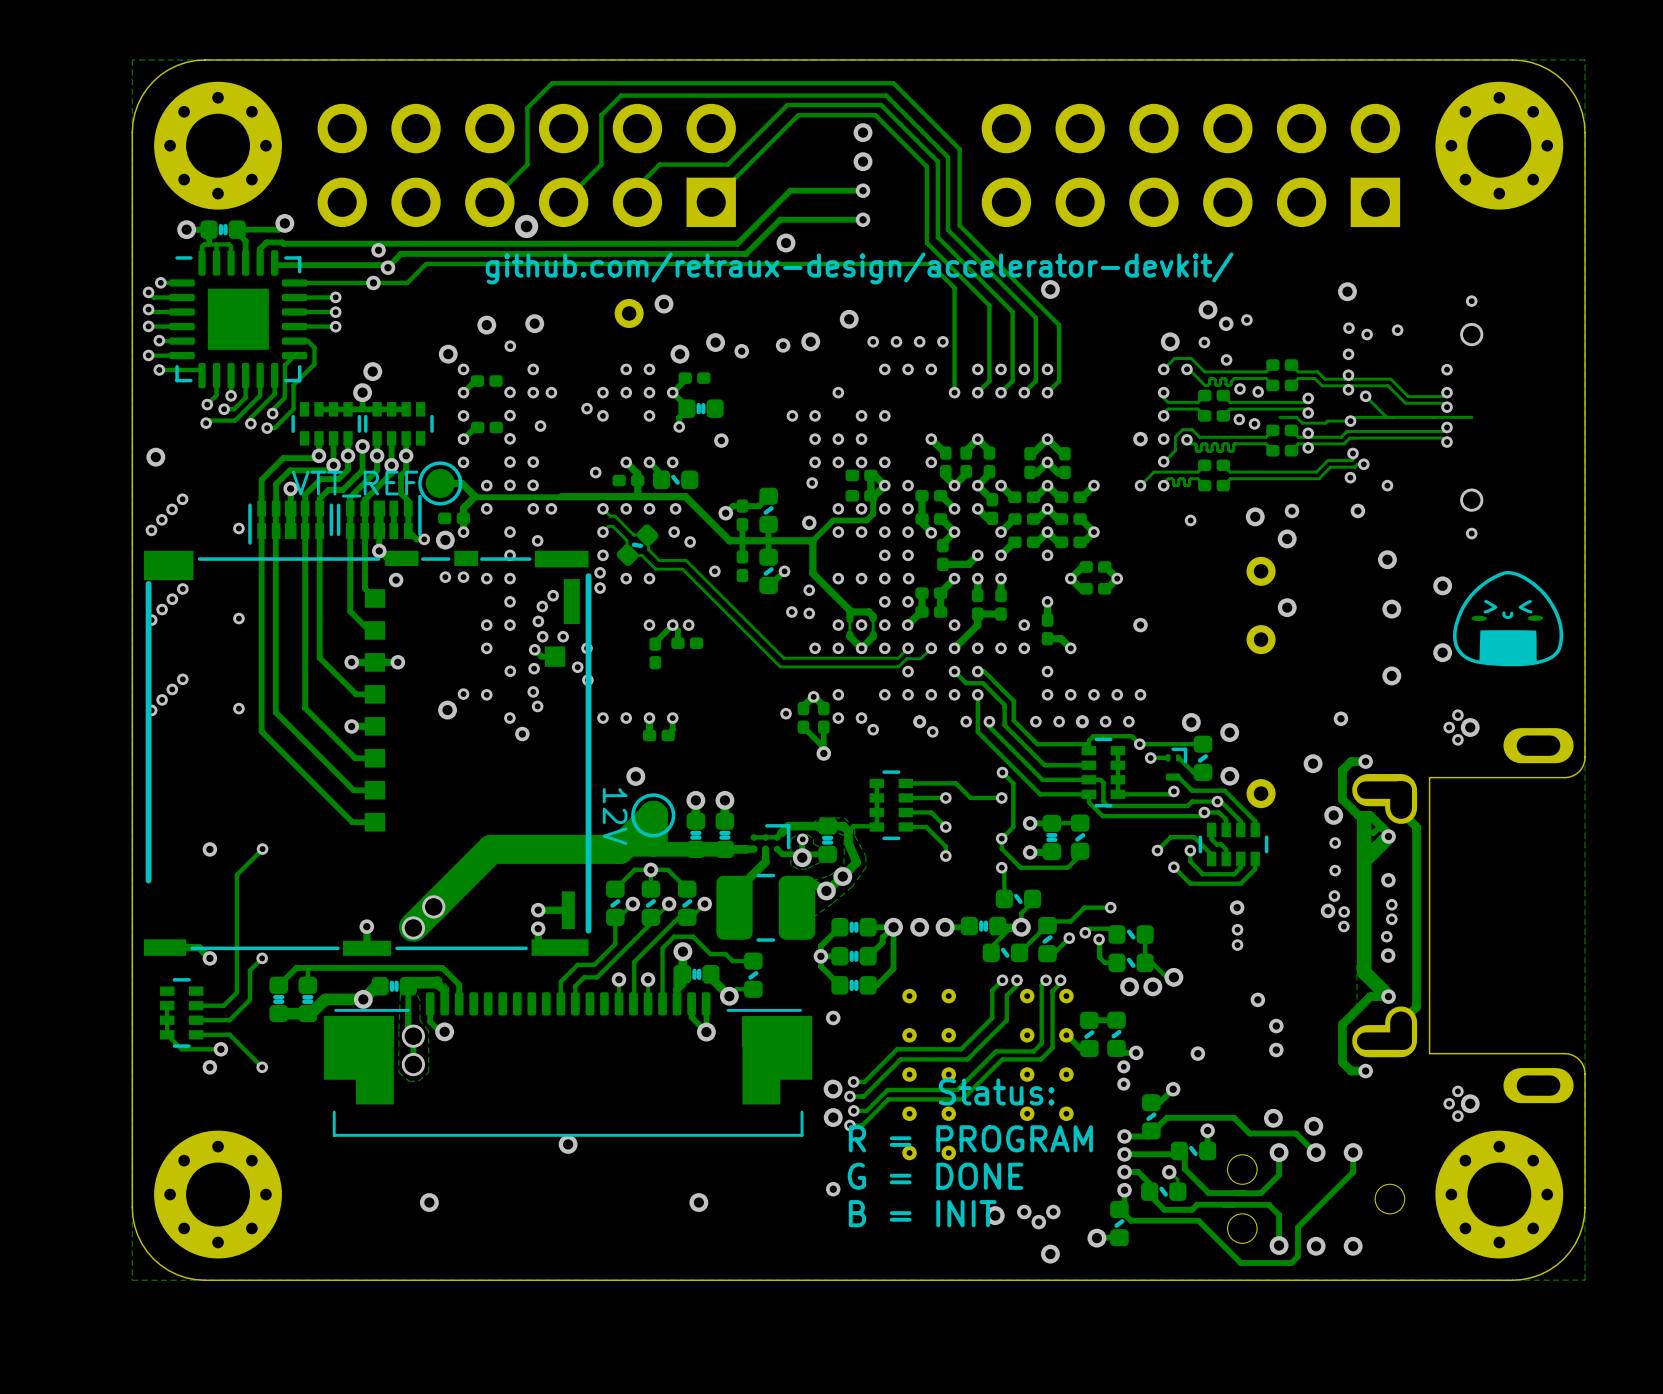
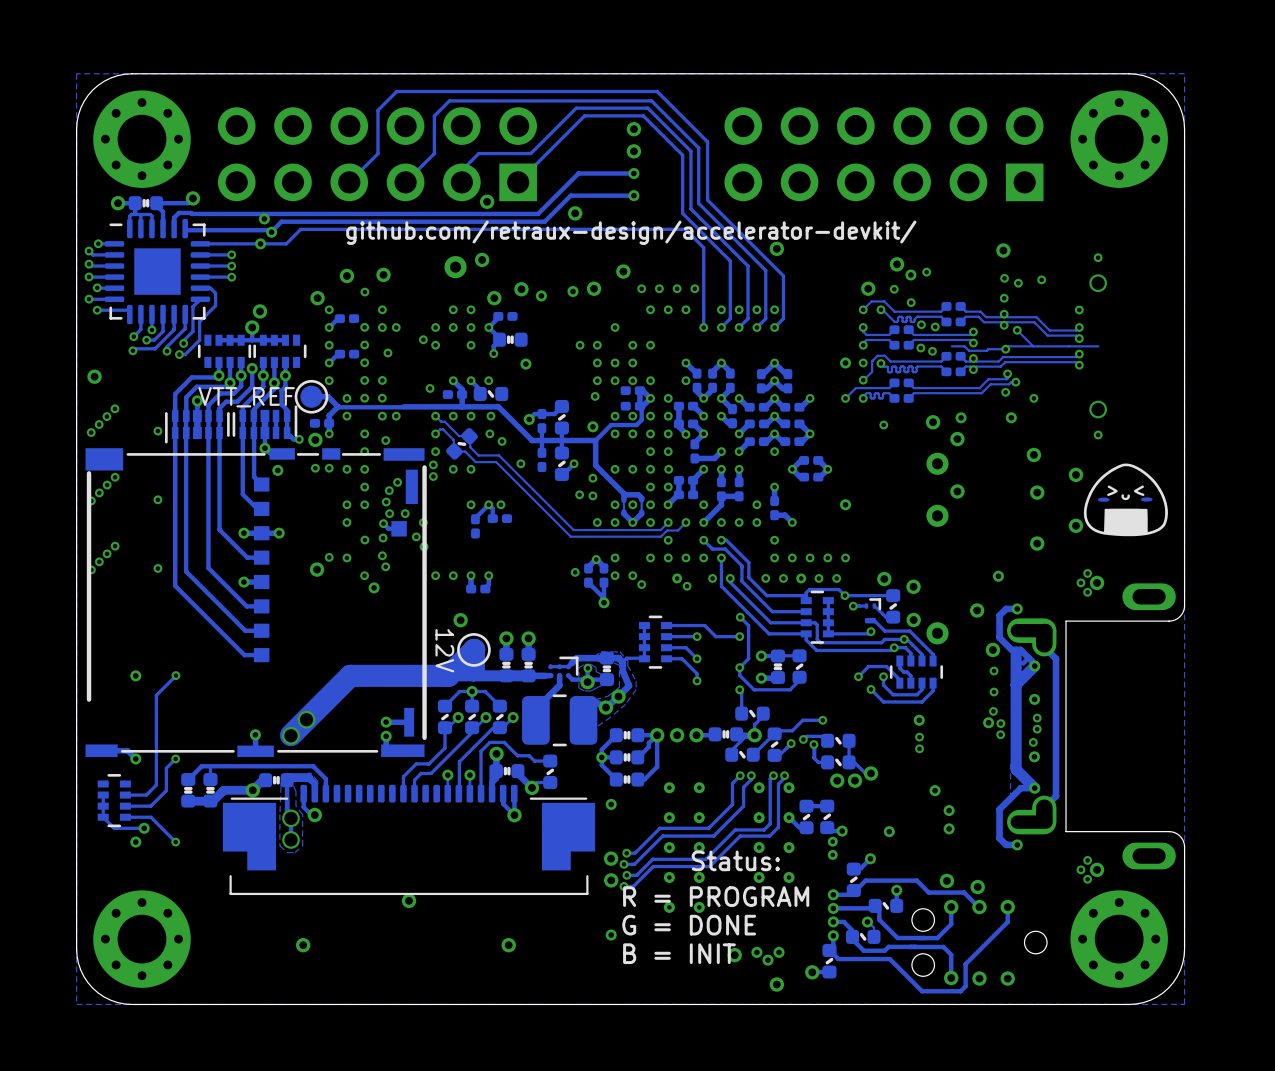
via: (526, 226) -> none
via: none -> (487, 201)

